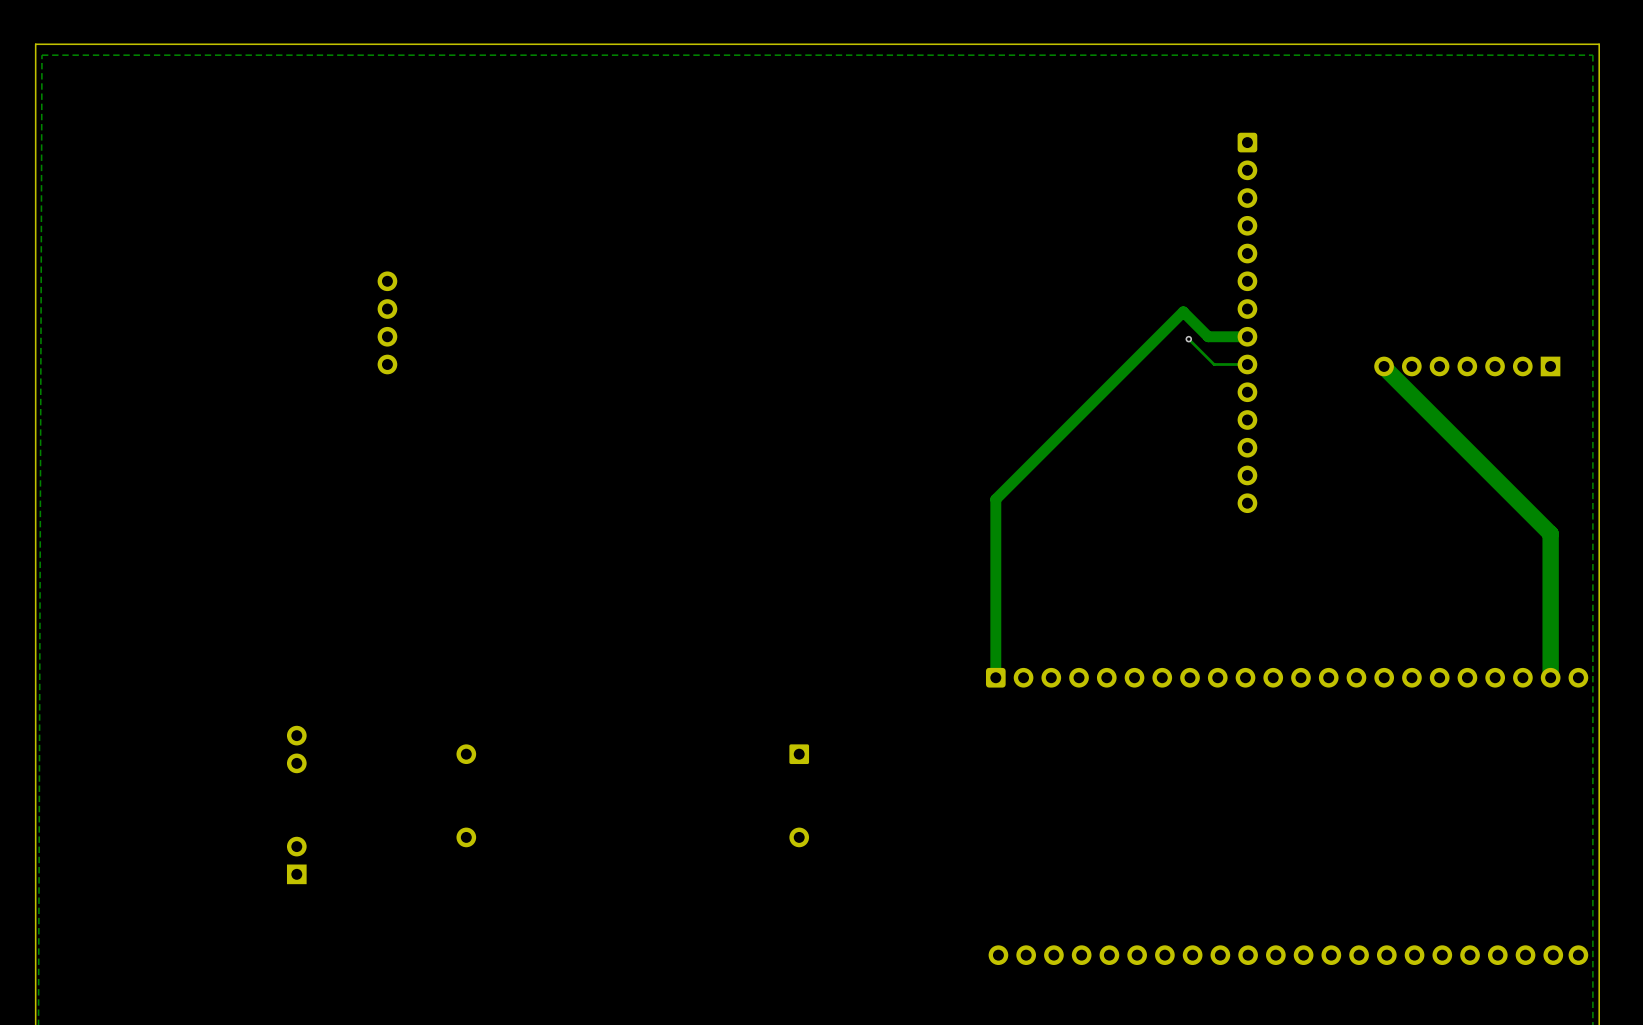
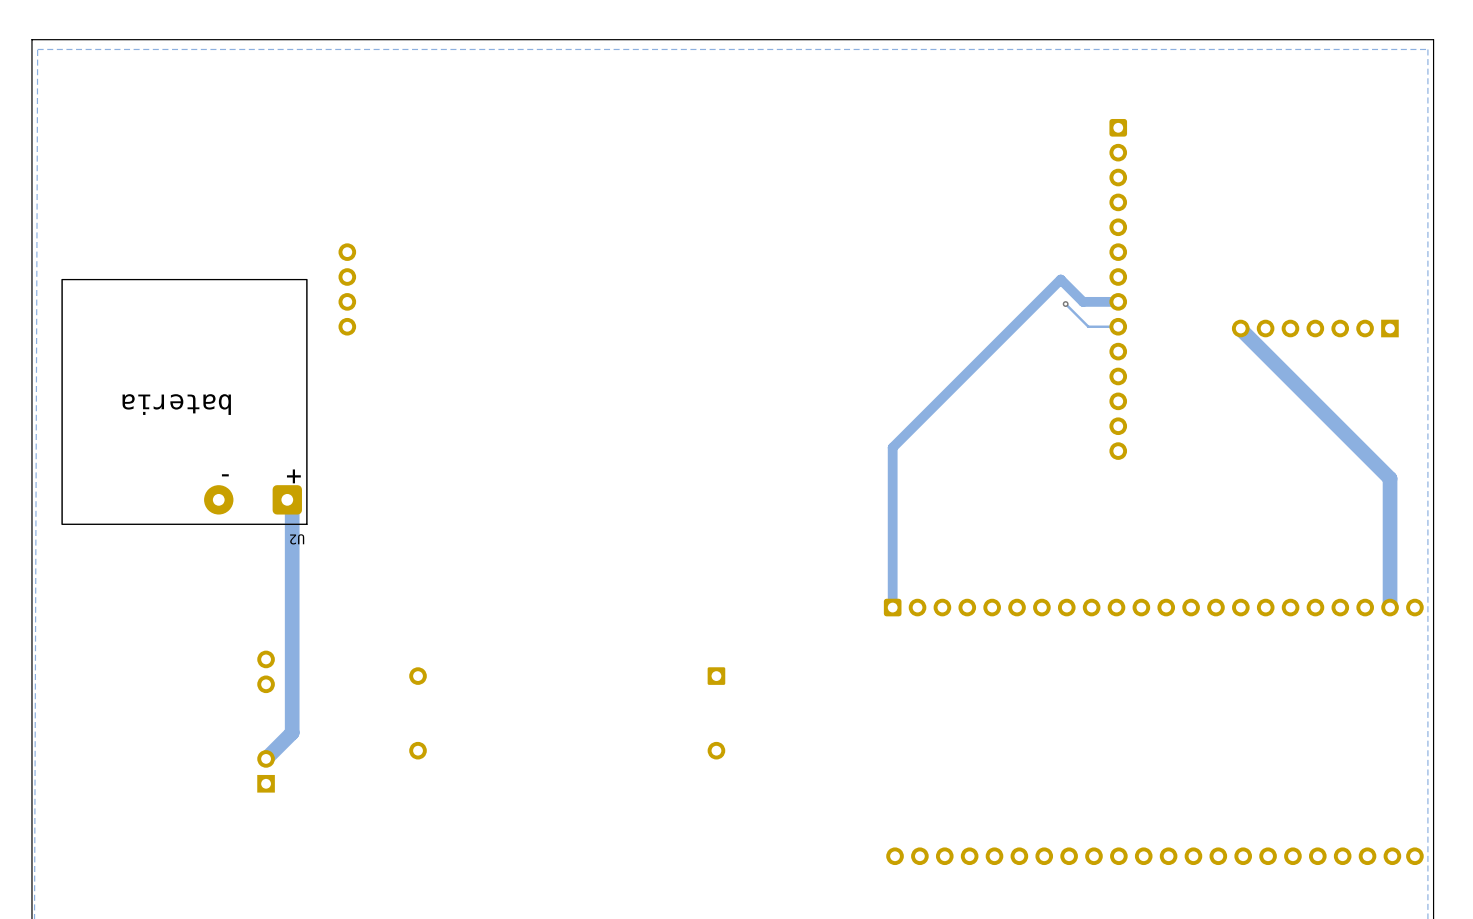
U2: none -> (184, 401)
track: none -> (287, 499) (292, 504) (292, 732) (266, 758)

